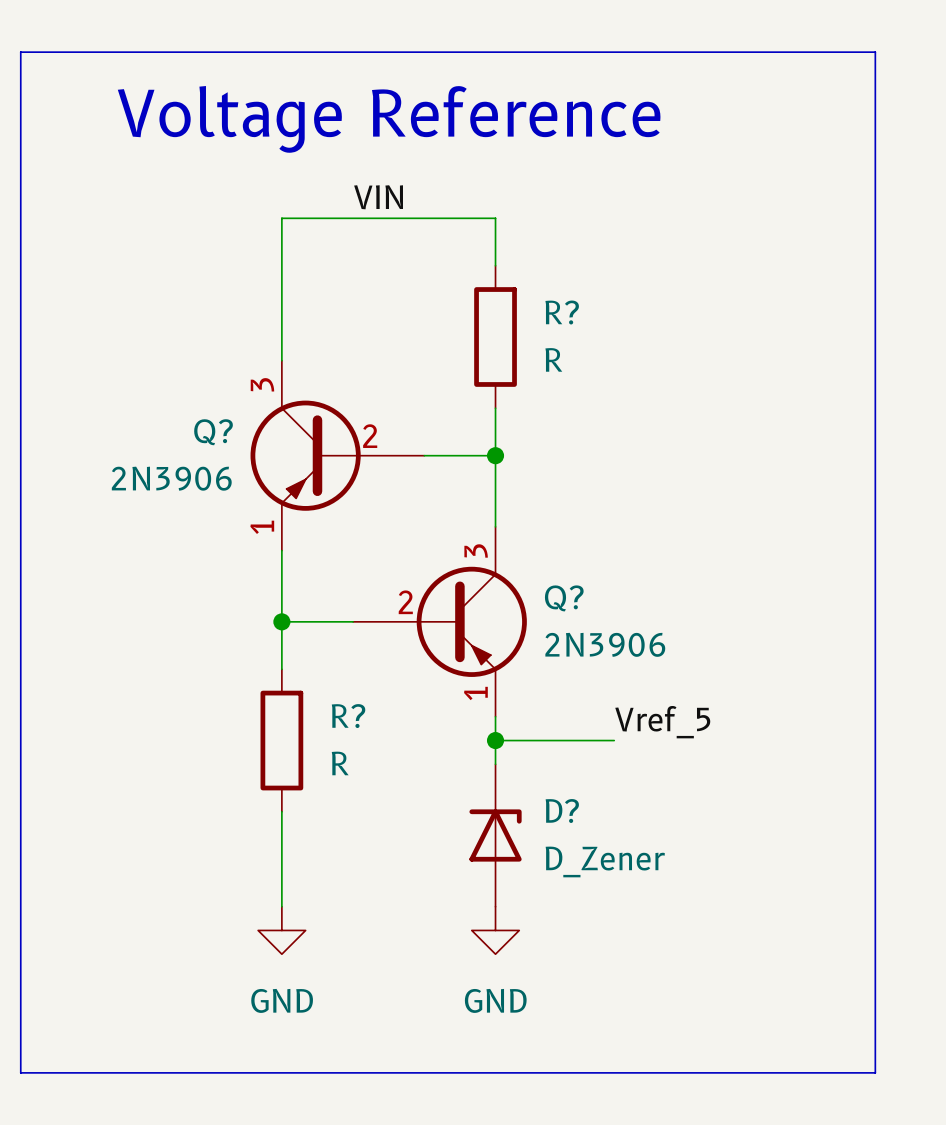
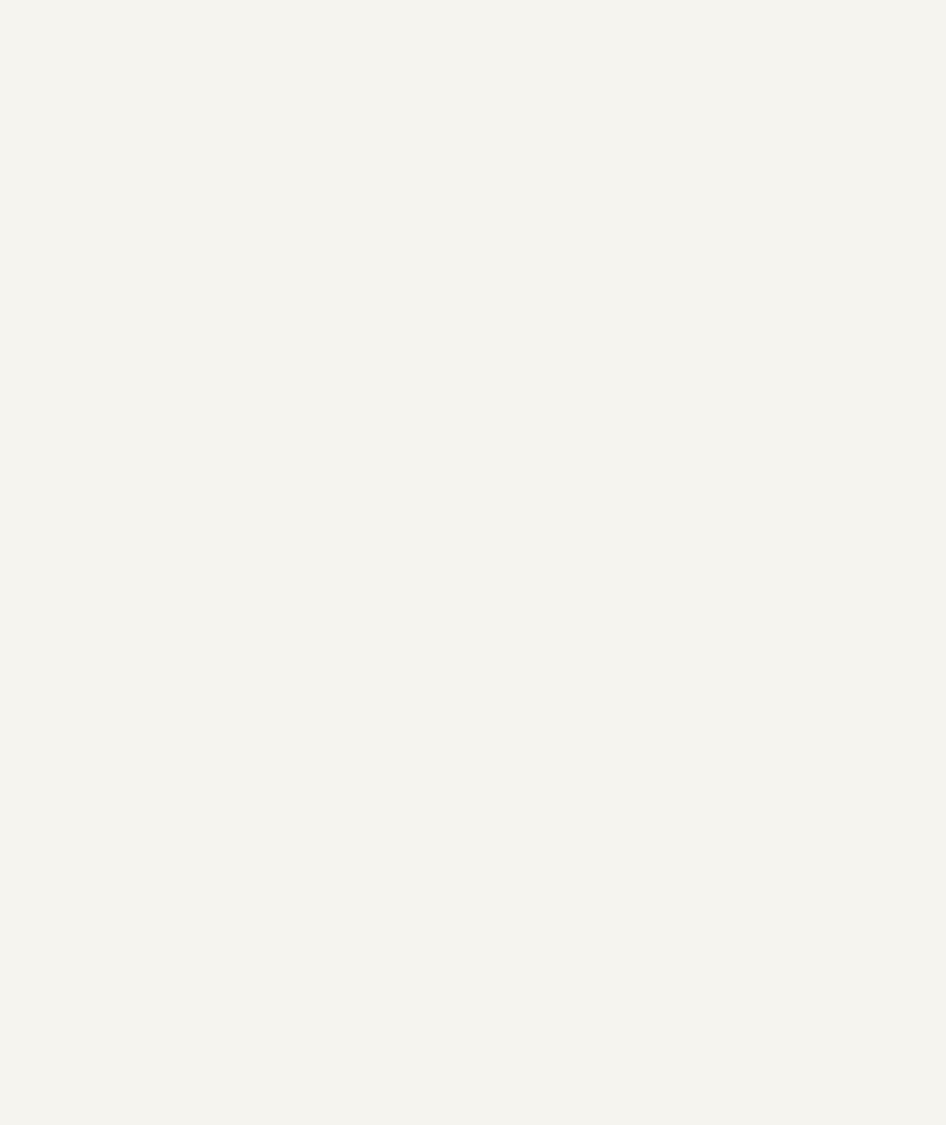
line: (20, 52) (20, 1072) (875, 1072) (875, 52) (20, 52) -> none
text: Voltage Reference (389, 119) -> none
label: VIN (378, 197) -> none
wire: (495, 265) (495, 218) (281, 218) (281, 360) -> none
R?: R (495, 337) -> none
wire: (495, 408) (495, 526) -> none
Q?: 2N3906 (337, 455) -> none
wire: (424, 455) (495, 455) -> none
junction: (495, 455) -> none
wire: (281, 550) (281, 669) -> none
wire: (281, 621) (353, 621) -> none
junction: (281, 621) -> none
Q?: 2N3906 (439, 621) -> none
wire: (495, 716) (495, 764) -> none
label: Vref_5 (662, 722) -> none
R?: R (281, 740) -> none
wire: (495, 740) (614, 740) -> none
junction: (495, 740) -> none
wire: (281, 811) (281, 906) -> none
D?: D_Zener (495, 835) -> none
power symbol: GND (281, 930) -> none
power symbol: GND (495, 930) -> none

